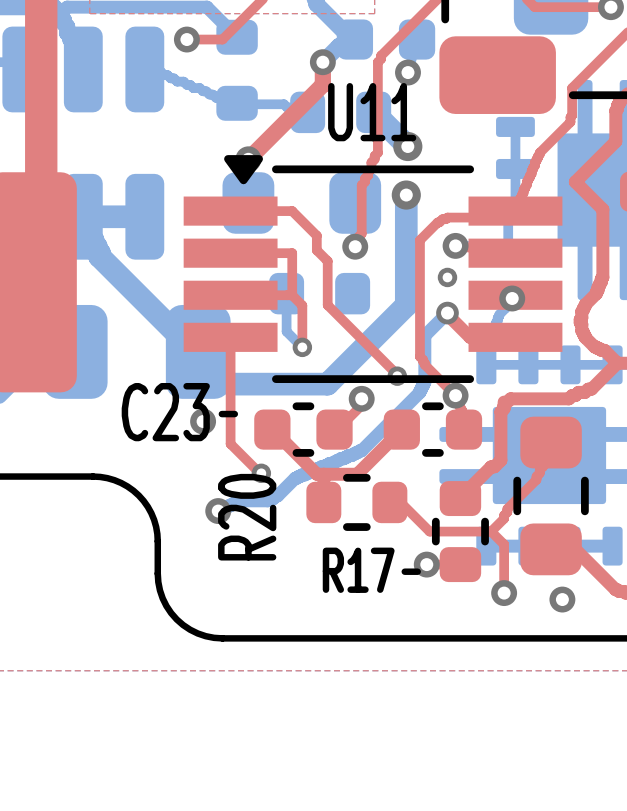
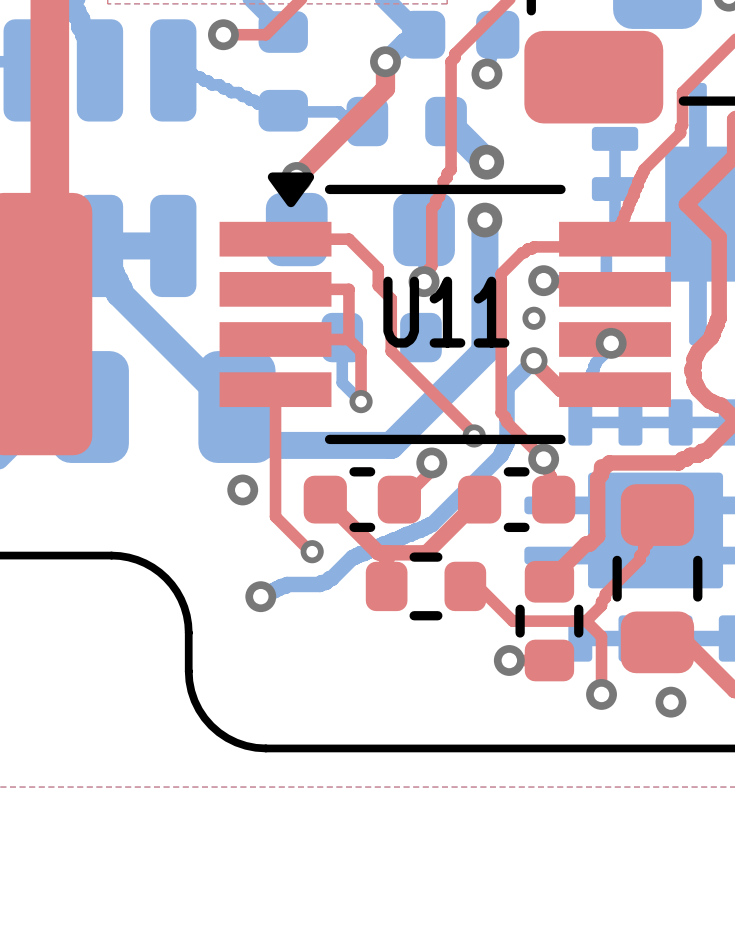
U11 name position: U11 (372, 112) -> U11 (446, 312)
C23 name: C23 (165, 412) -> none
line: (221, 414) (234, 414) -> none
R20 name: R20 (247, 517) -> none
R17 name: R17 (358, 570) -> none
line: (404, 571) (417, 571) -> none

